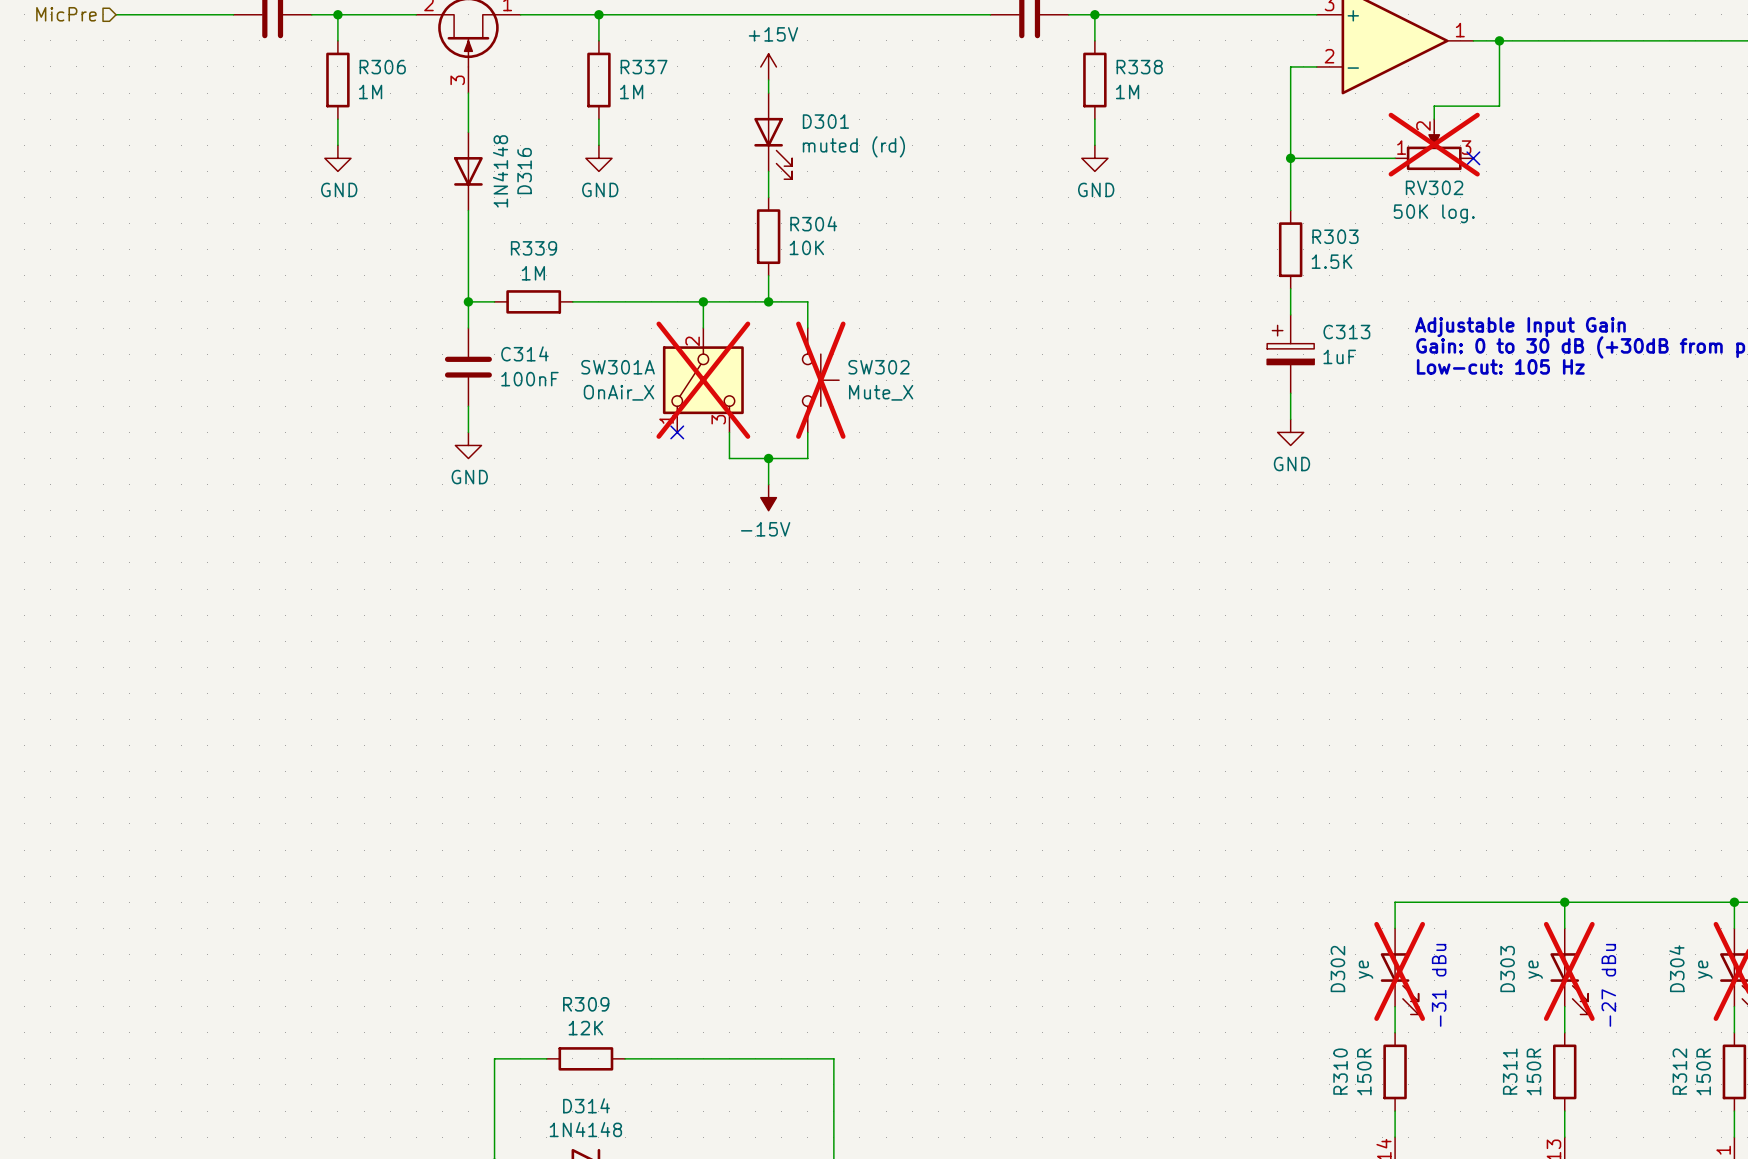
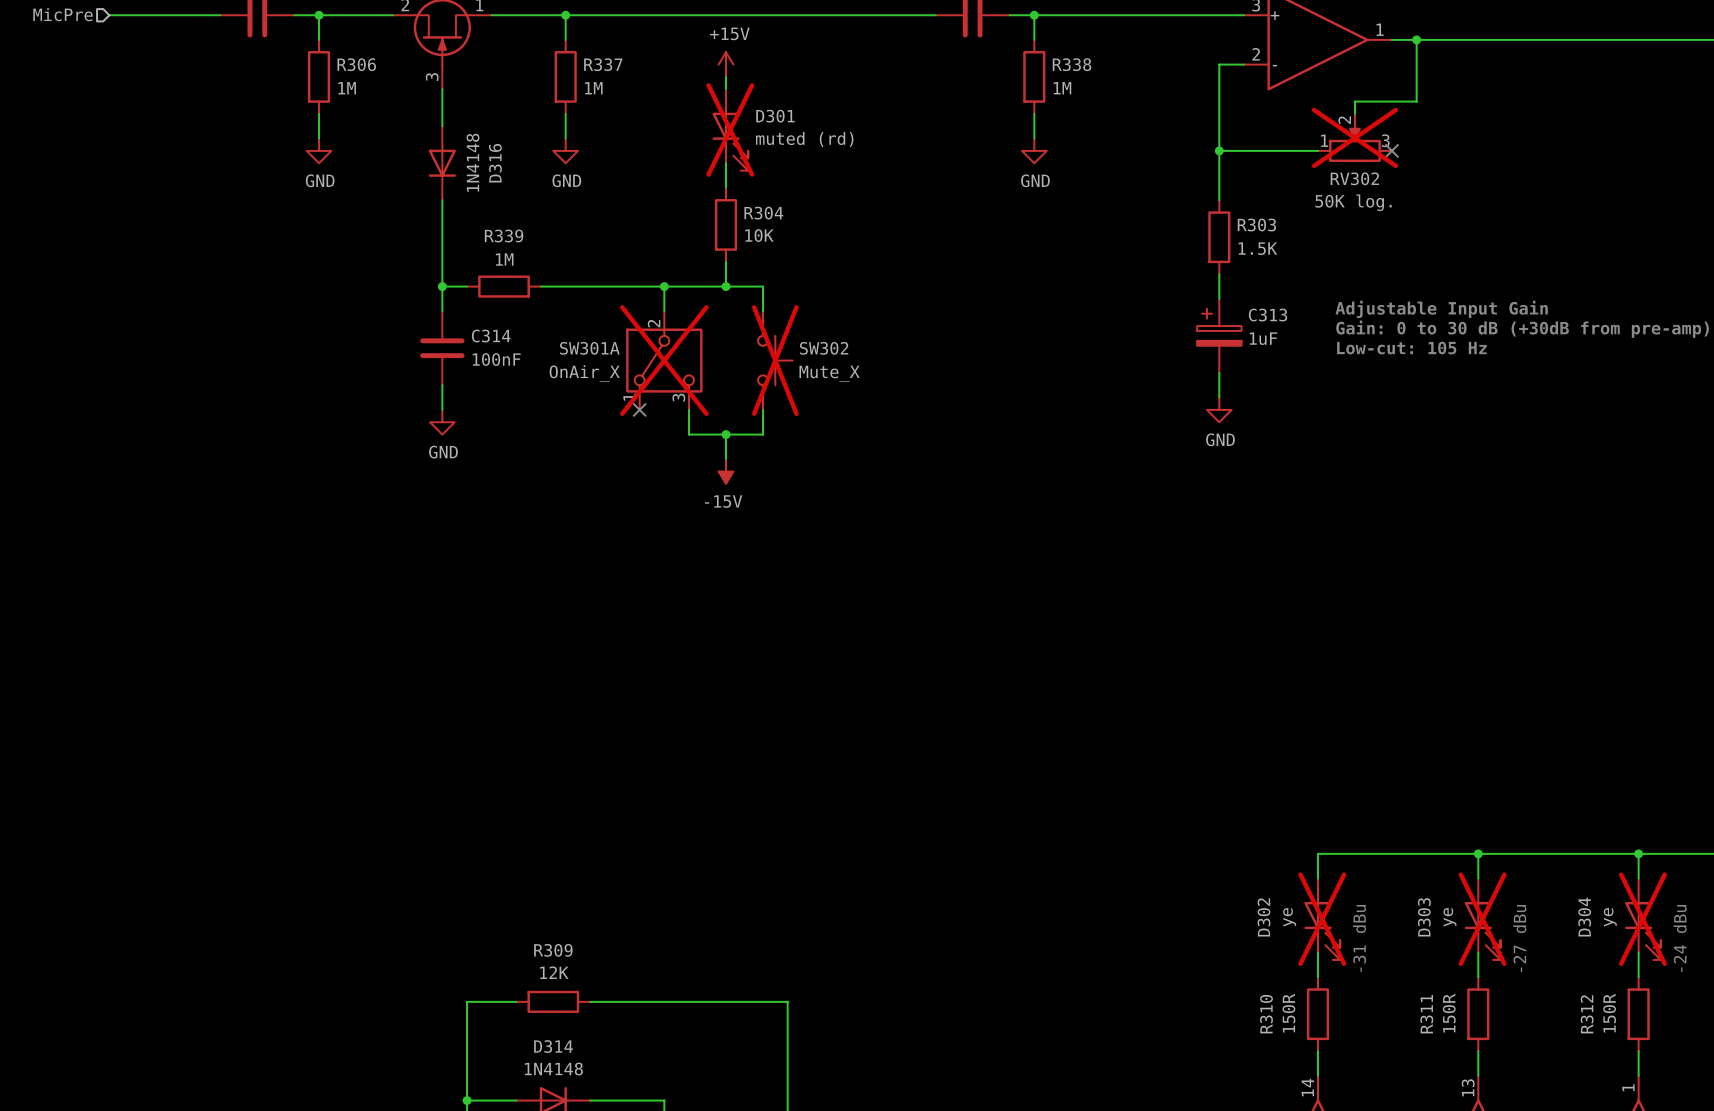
D301 do-not-place cross: none -> (730, 129)

